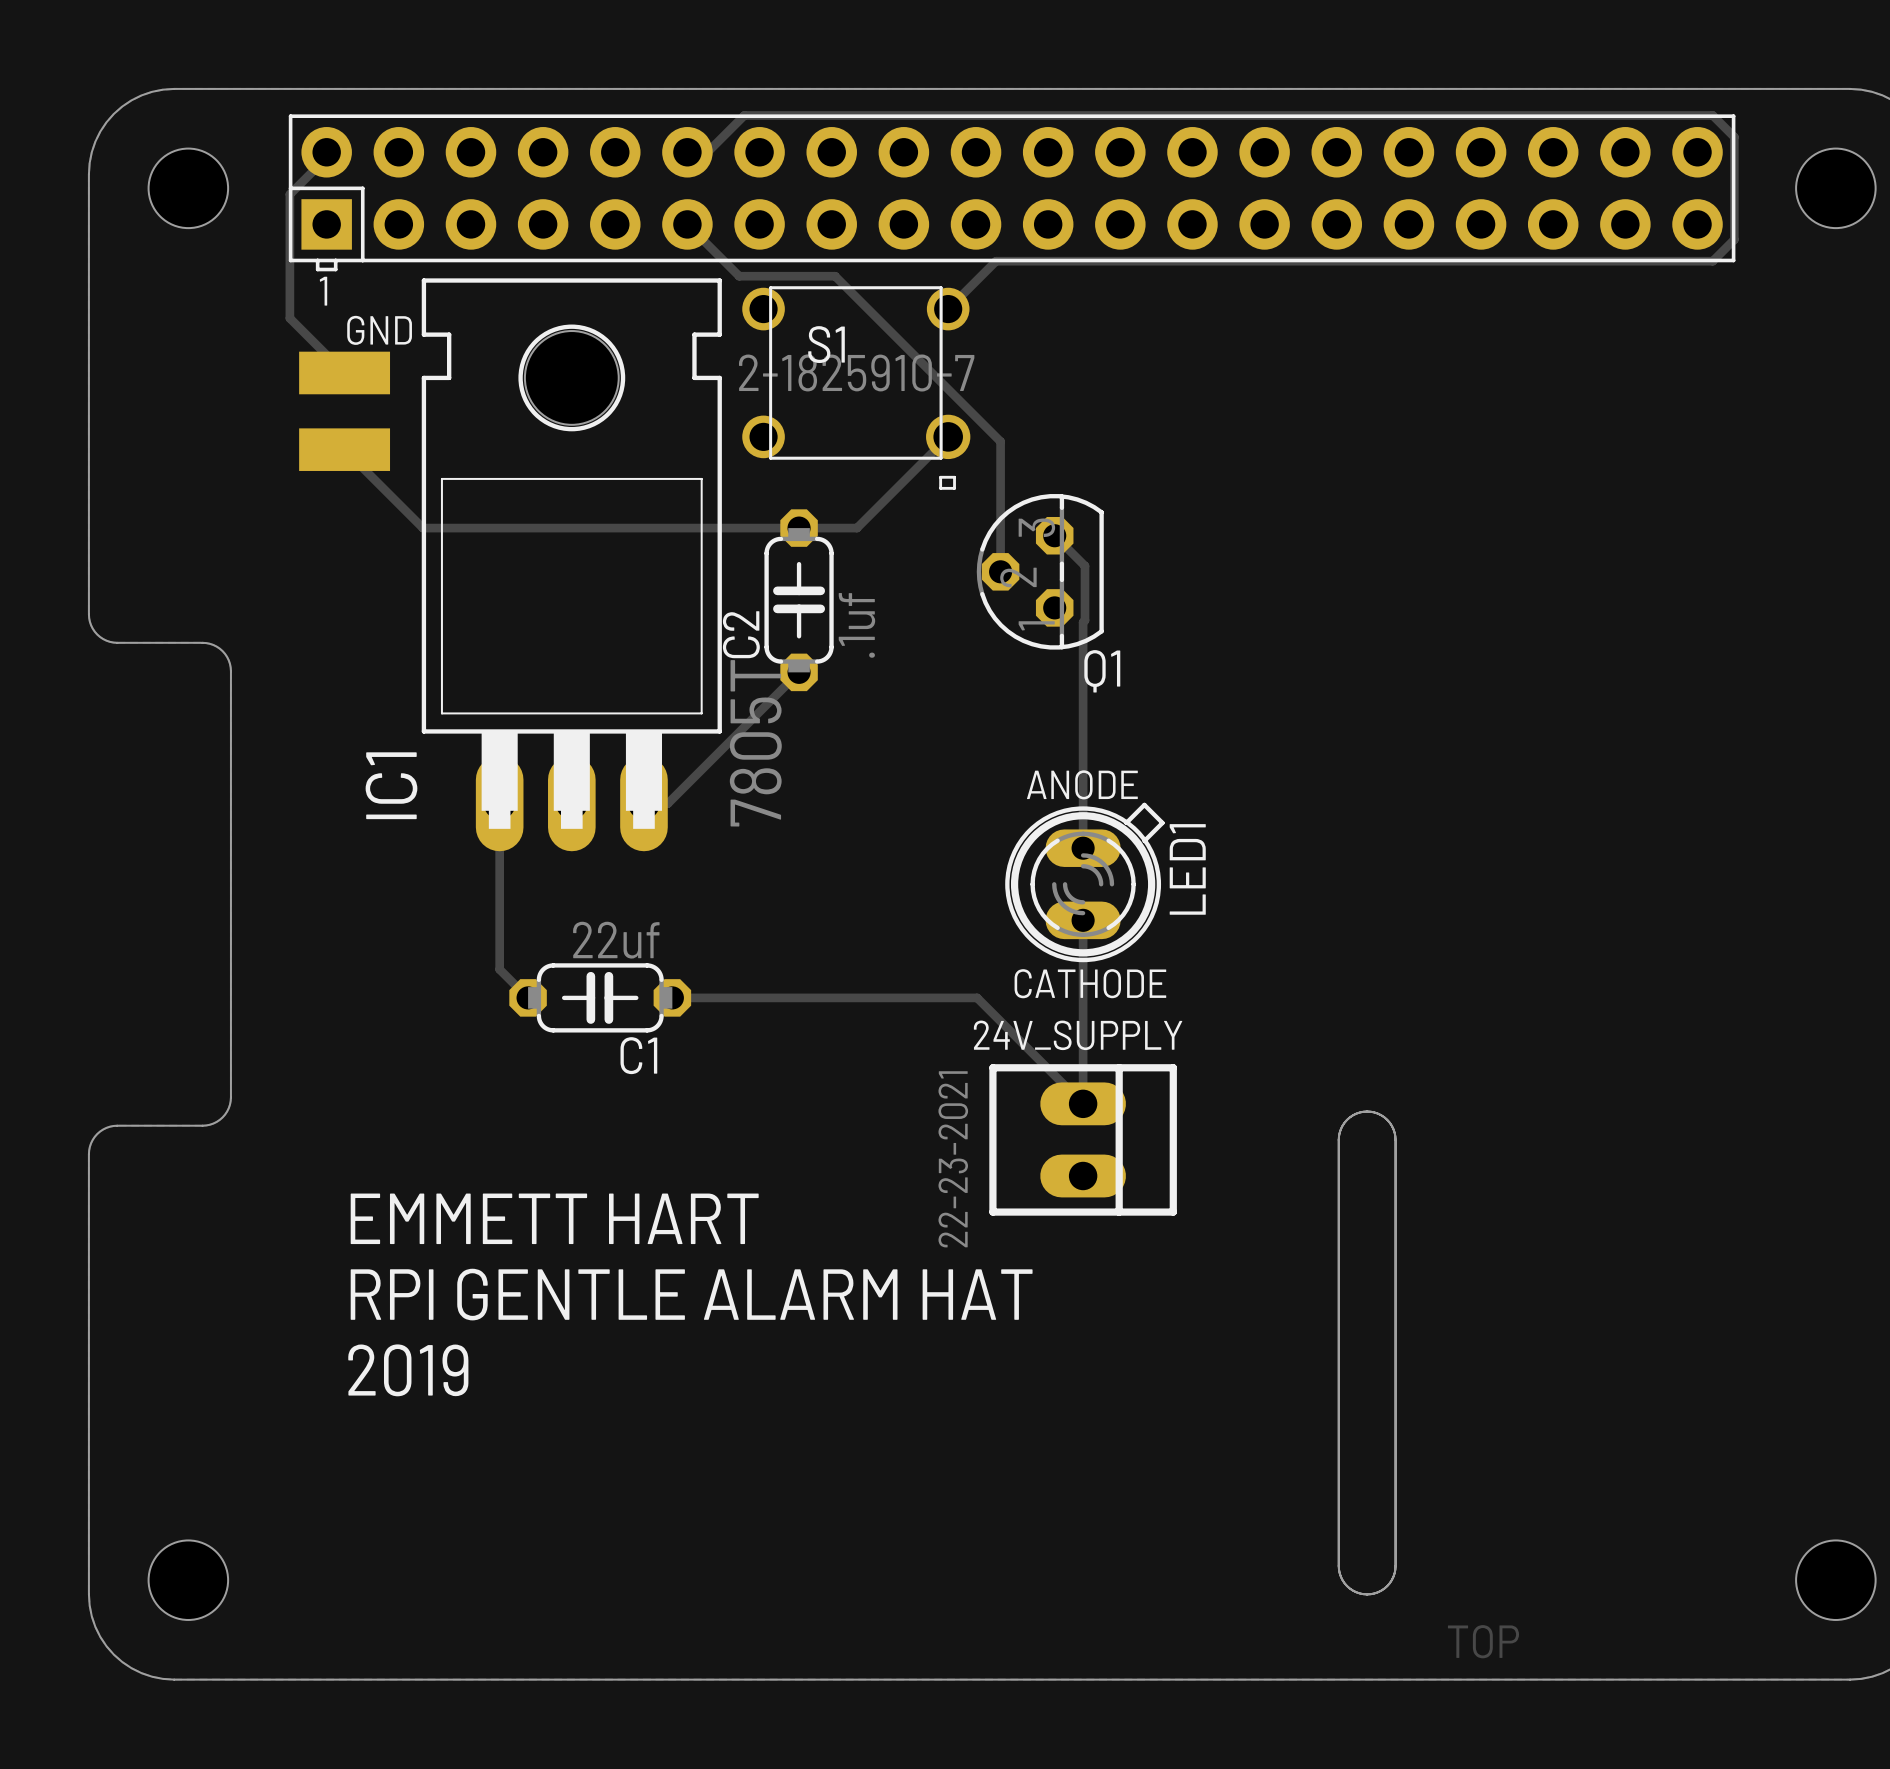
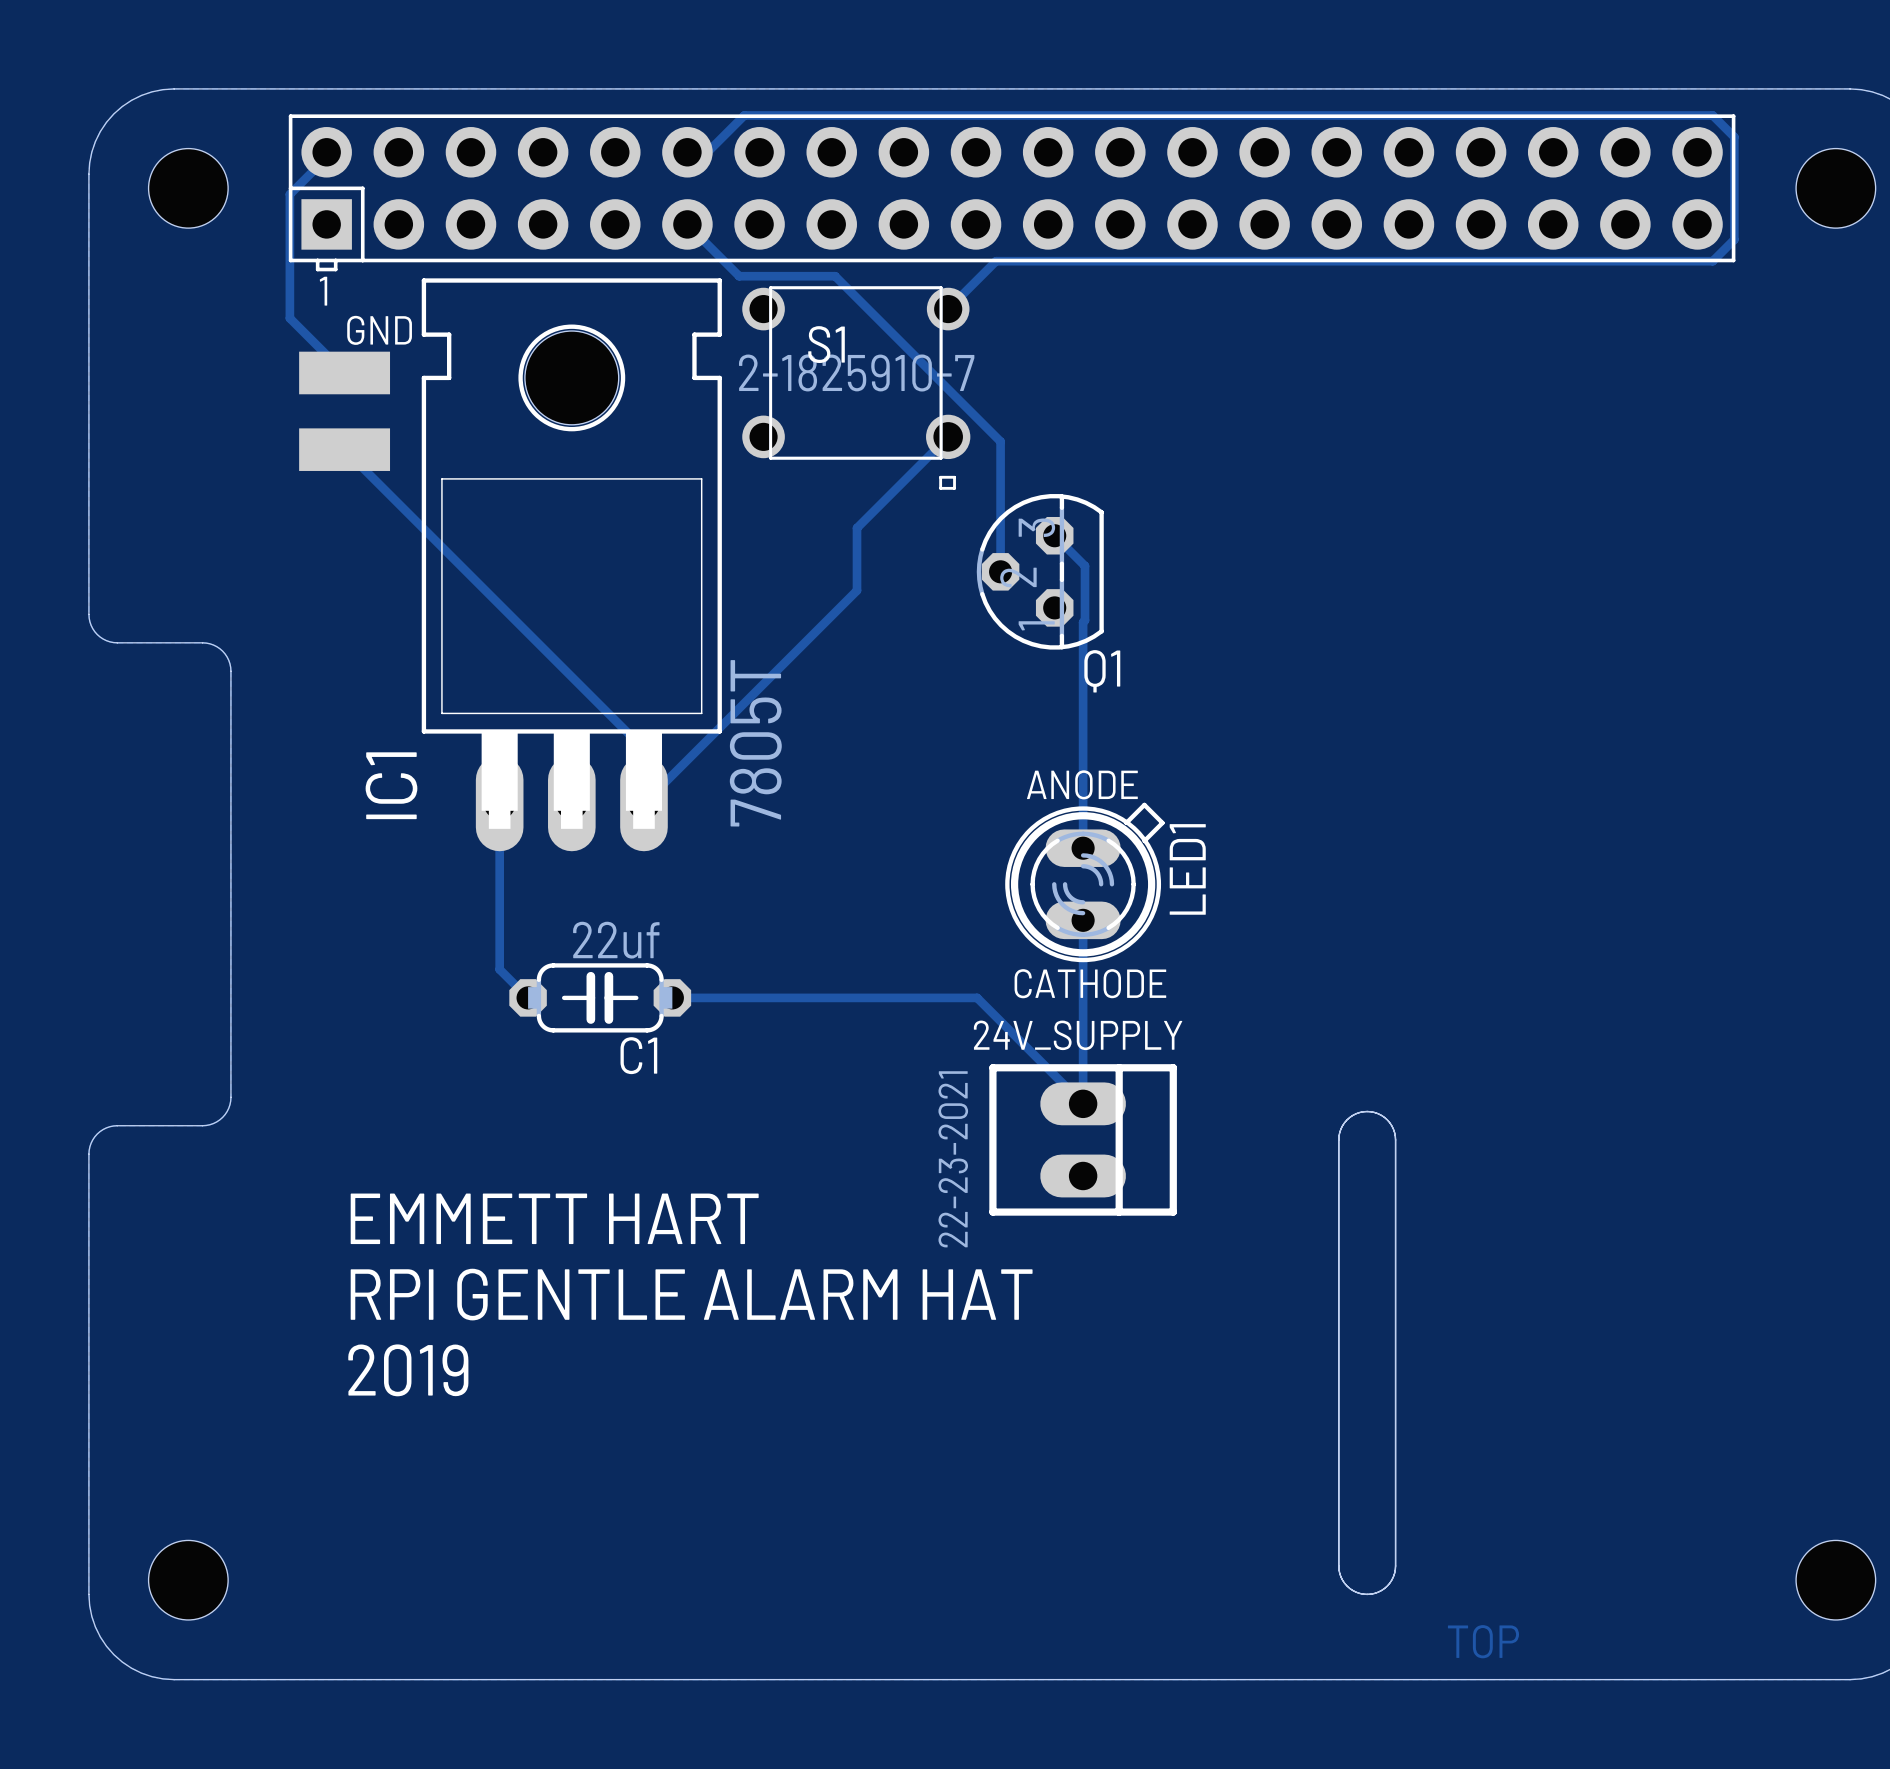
track: (422, 528) (857, 528) -> (422, 528) (643, 749) (643, 803) (857, 590) (857, 528)
C2: .1uf (799, 600) -> none
track: (799, 672) (667, 803) (643, 803) -> none

